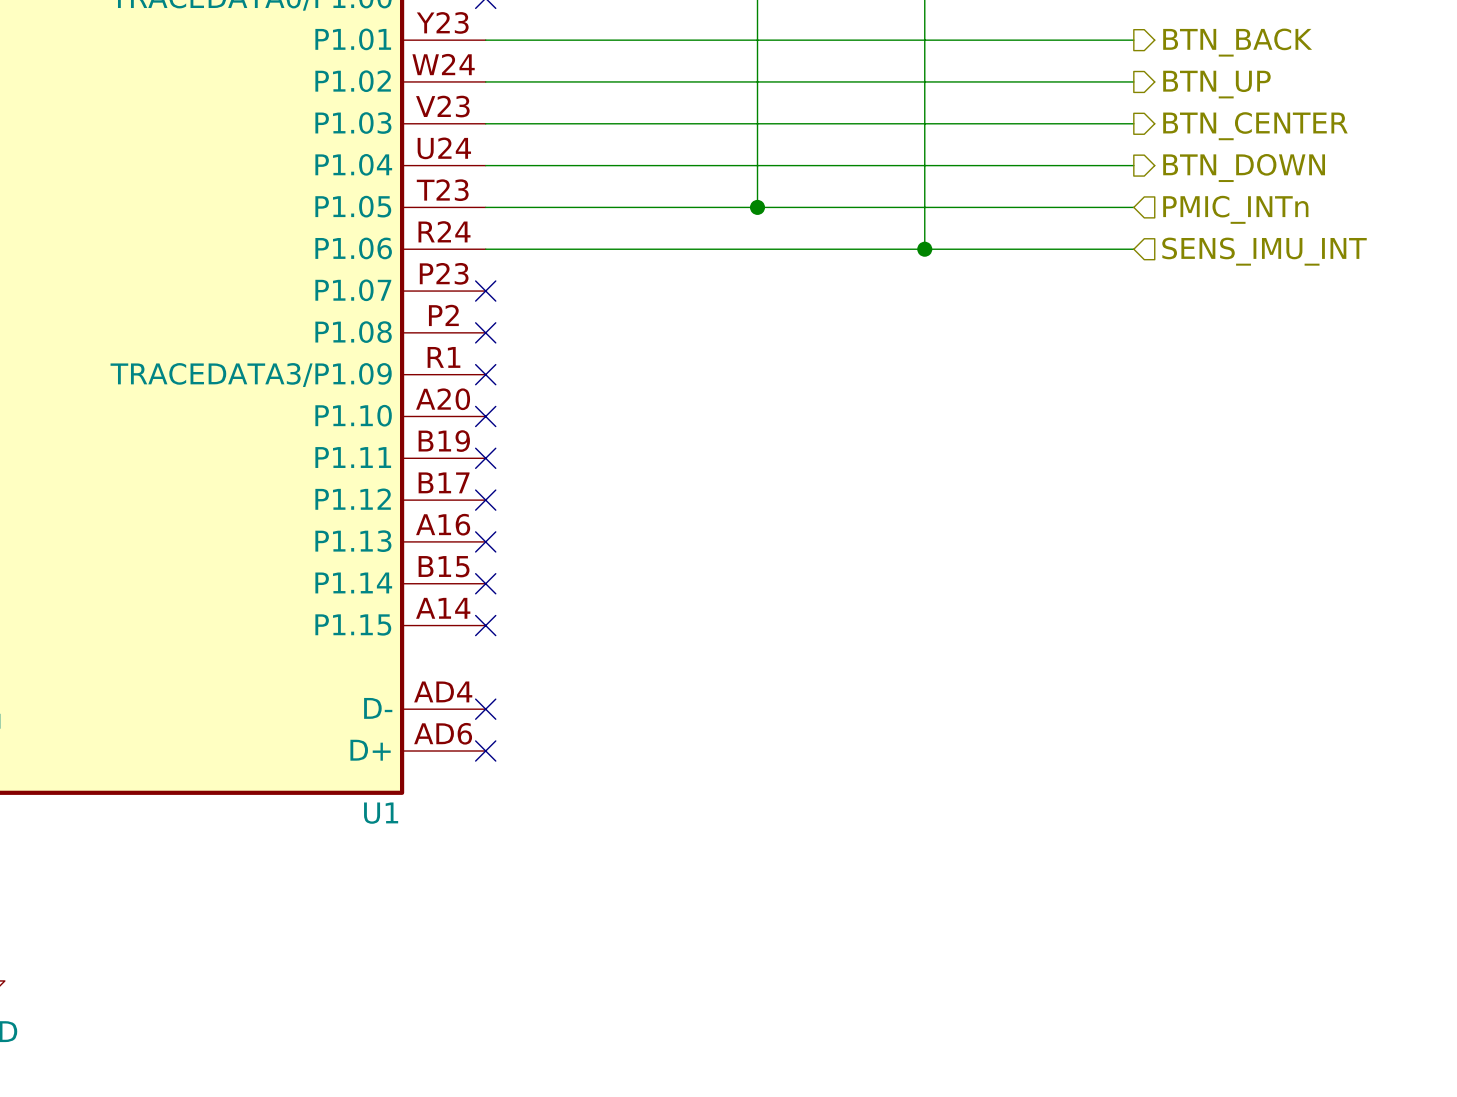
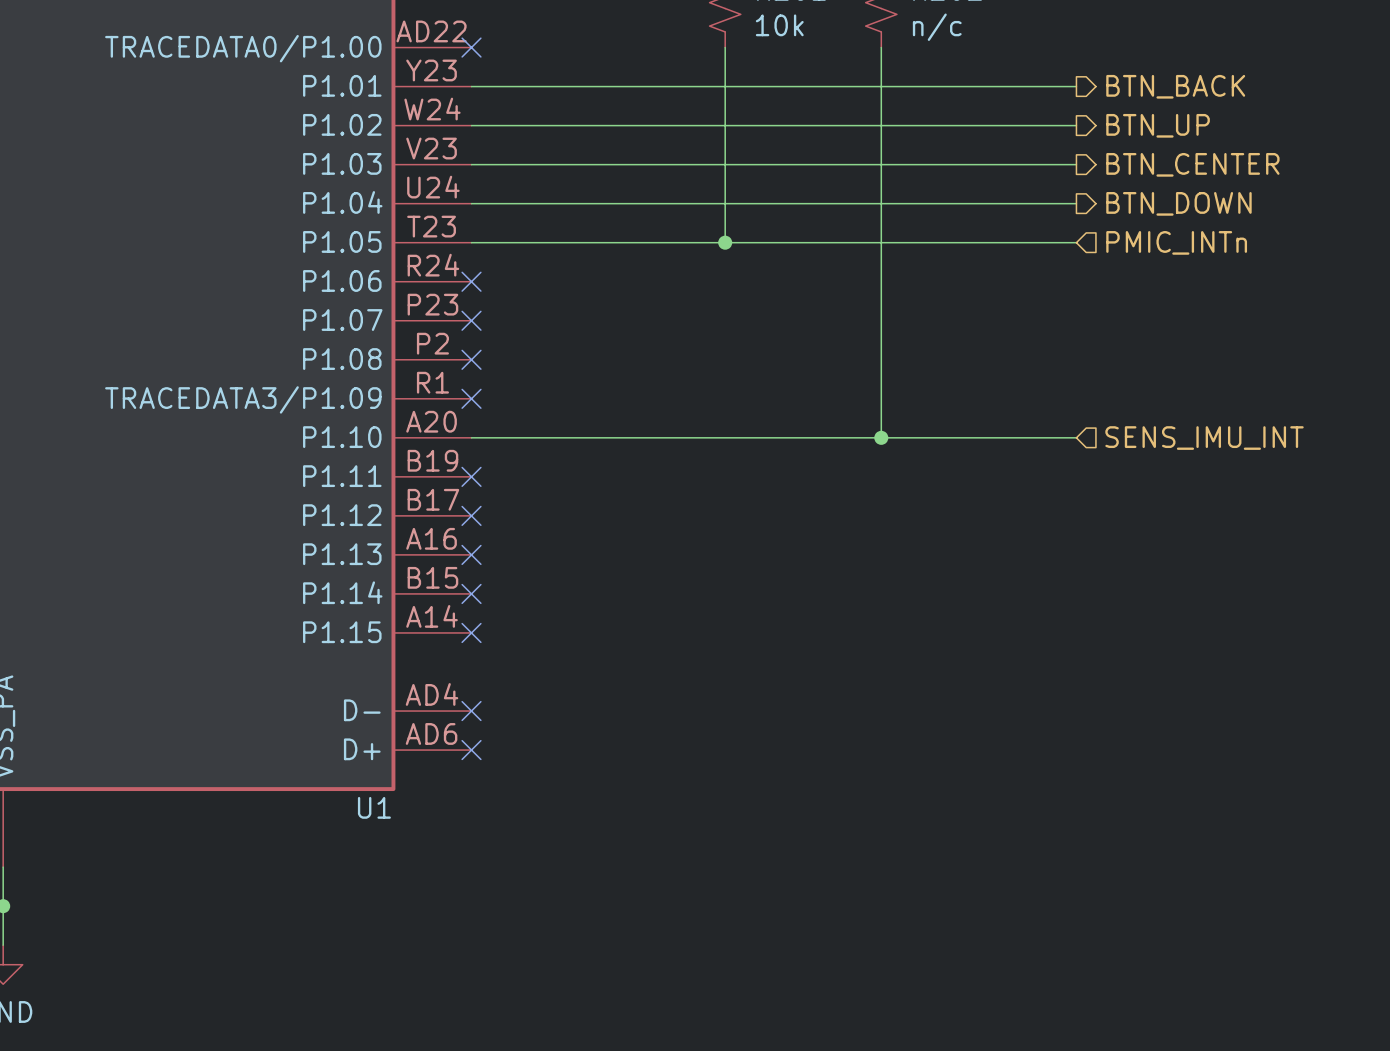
wire: (485, 249) (1133, 249) -> (471, 437) (1076, 437)
no-connect mark: none -> (471, 281)
wire: none -> (881, 281) (881, 437)
junction: (924, 249) -> none
hierarchical label position: SENS_IMU_INT (1264, 251) -> SENS_IMU_INT (1204, 438)
no-connect mark: (485, 416) -> none
junction: none -> (881, 437)

